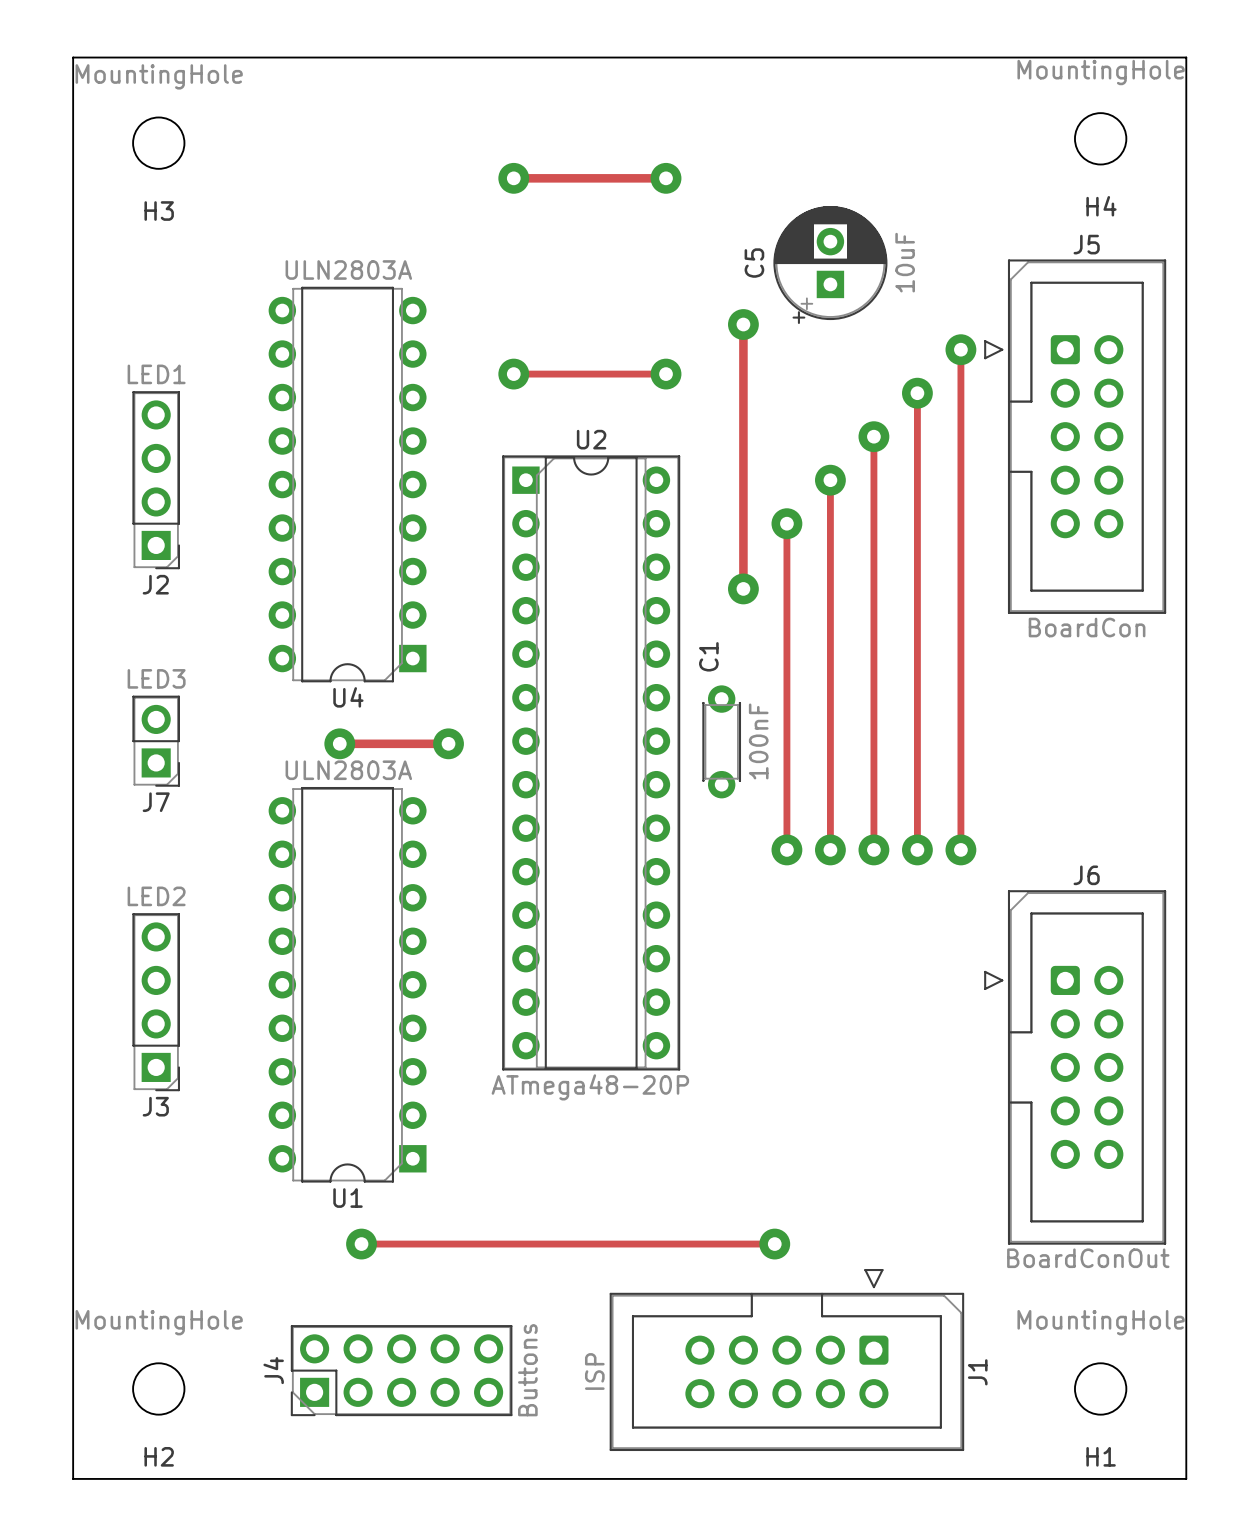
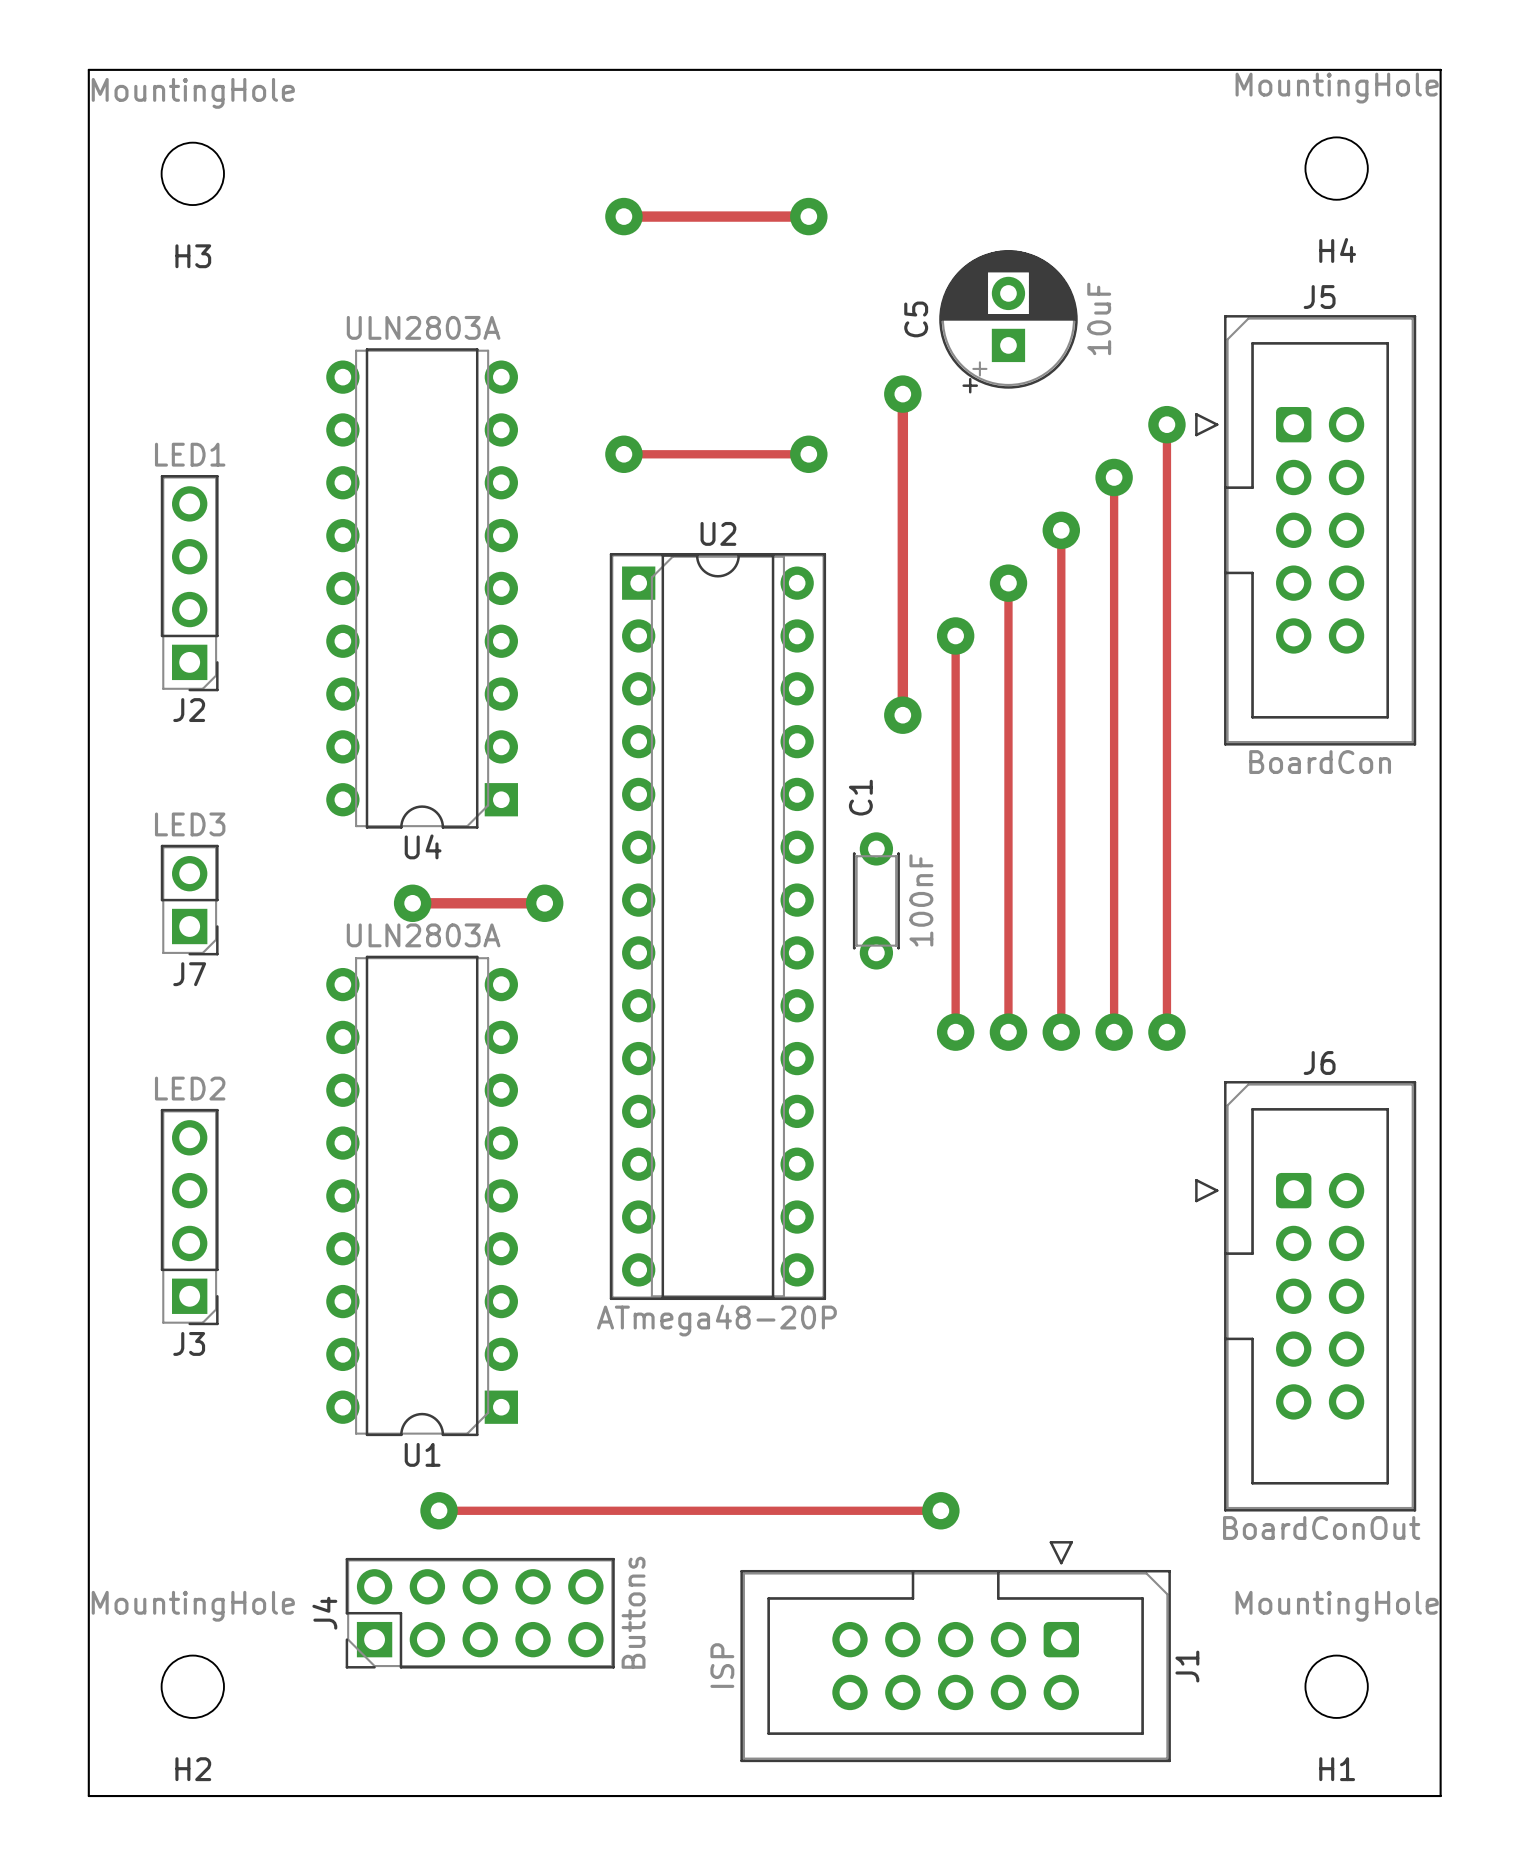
J4 position: (401, 1370) -> (480, 1613)

